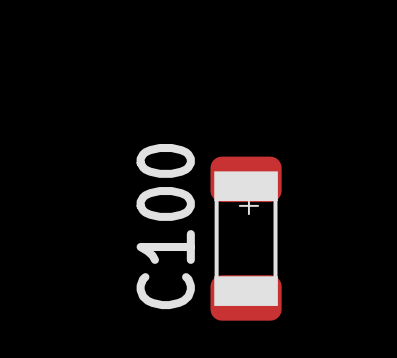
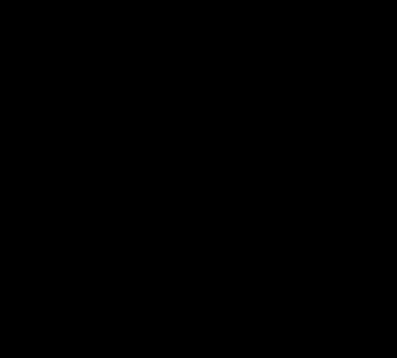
C100: (246, 238) -> none

